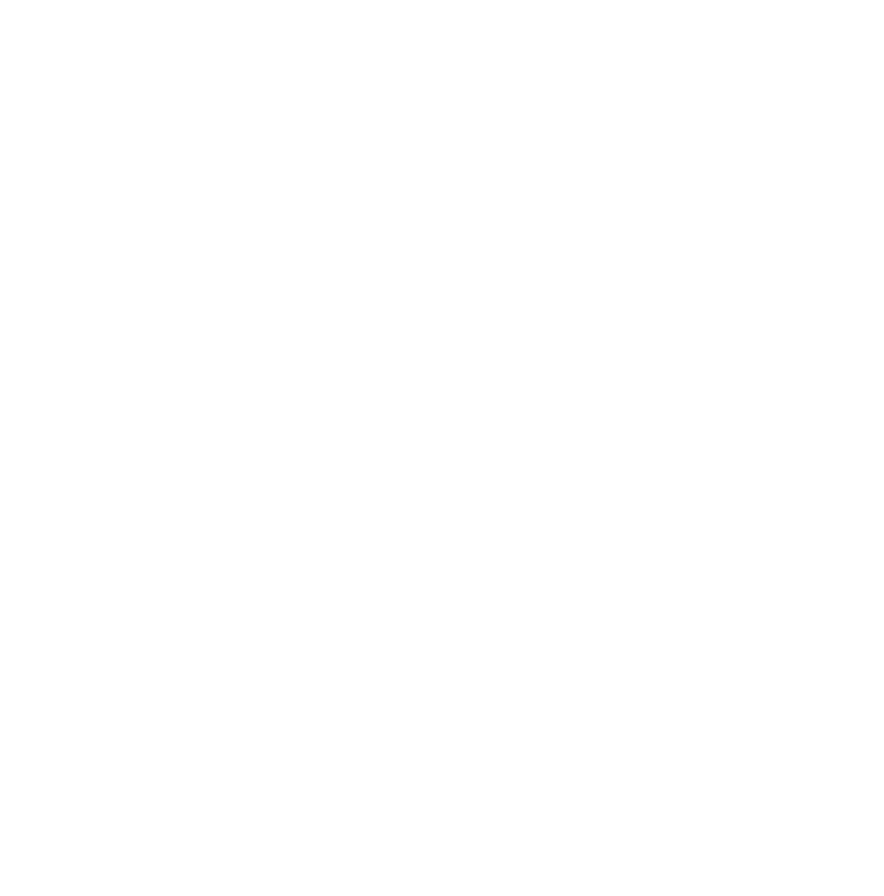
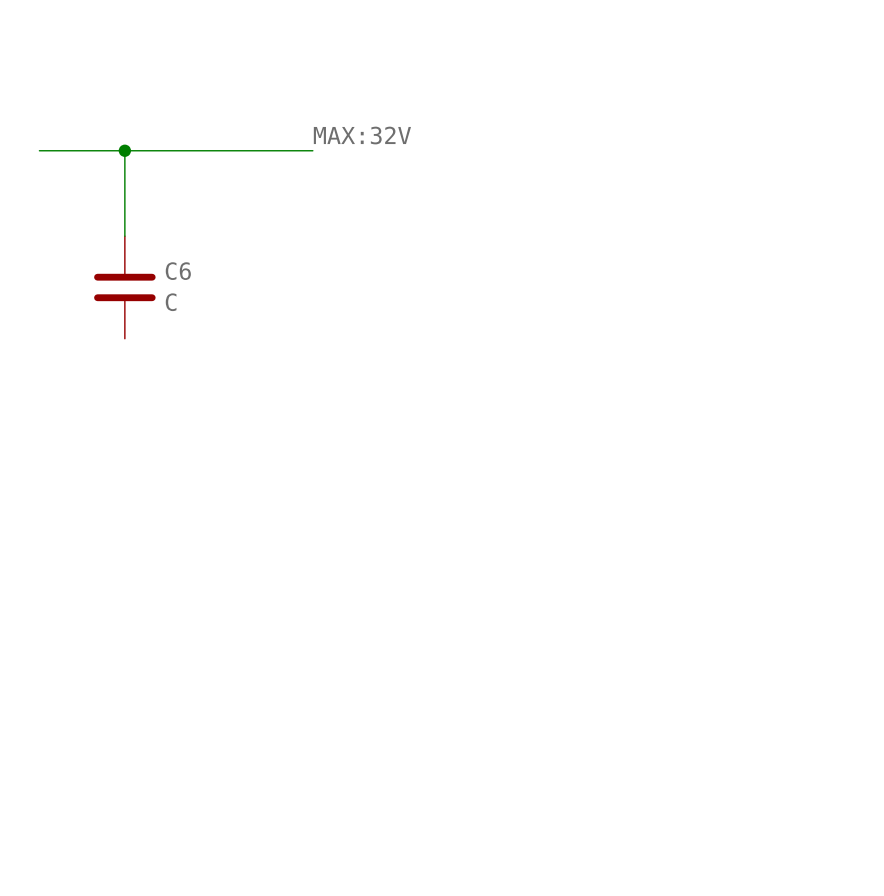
label: none -> MAX:32V (362, 135)
wire: none -> (39, 150) (312, 150)
wire: none -> (124, 150) (124, 236)
junction: none -> (124, 150)
C6: none -> C (124, 287)

